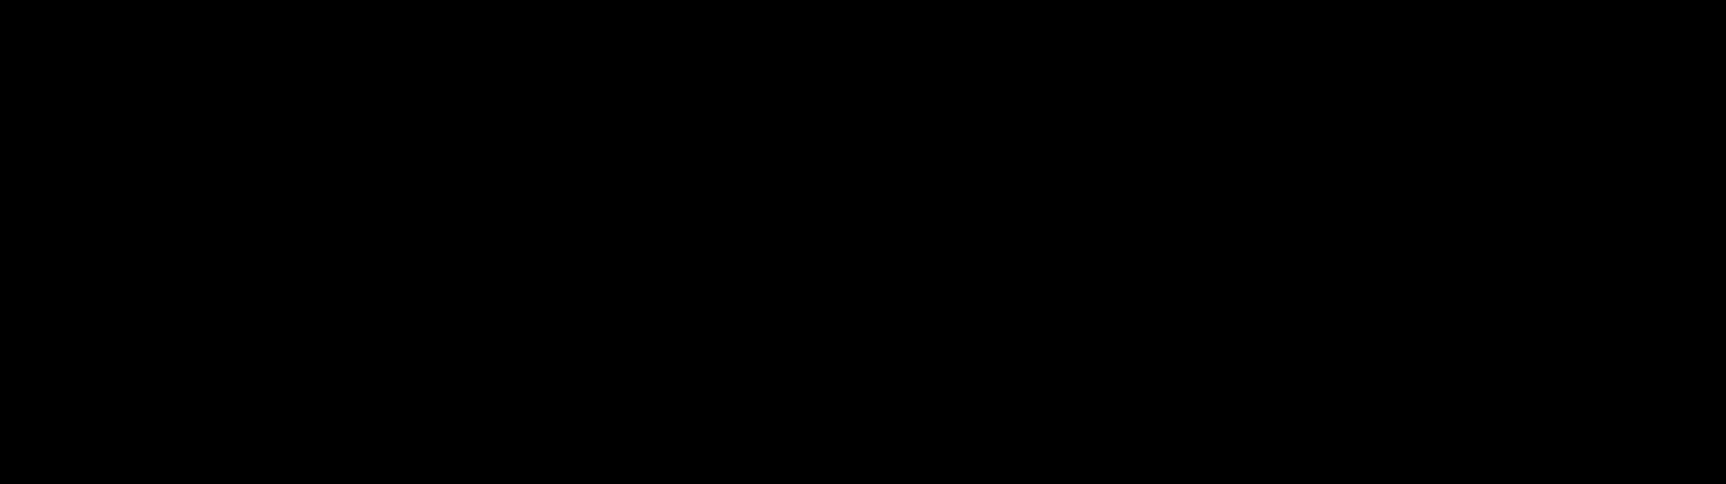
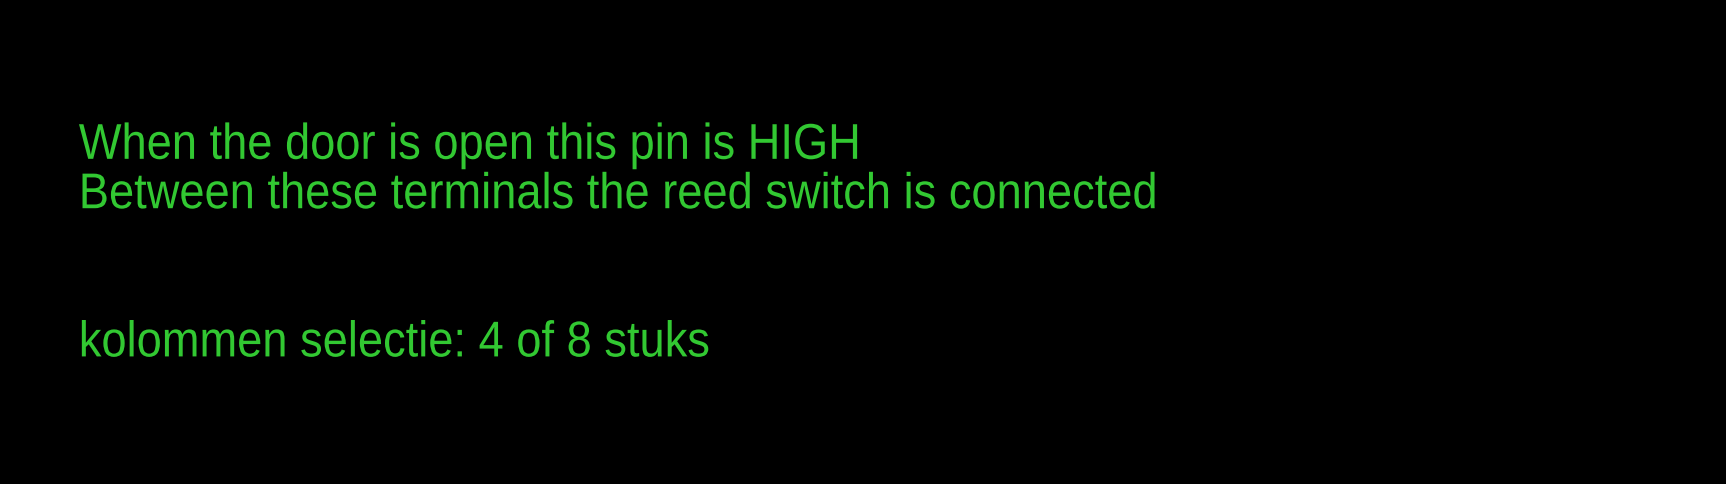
text: none -> When the door is open this pin is HIGH (468, 145)
text: none -> Between these terminals the reed switch is connected (618, 190)
text: none -> kolommen selectie: 4 of 8 stuks (395, 338)

